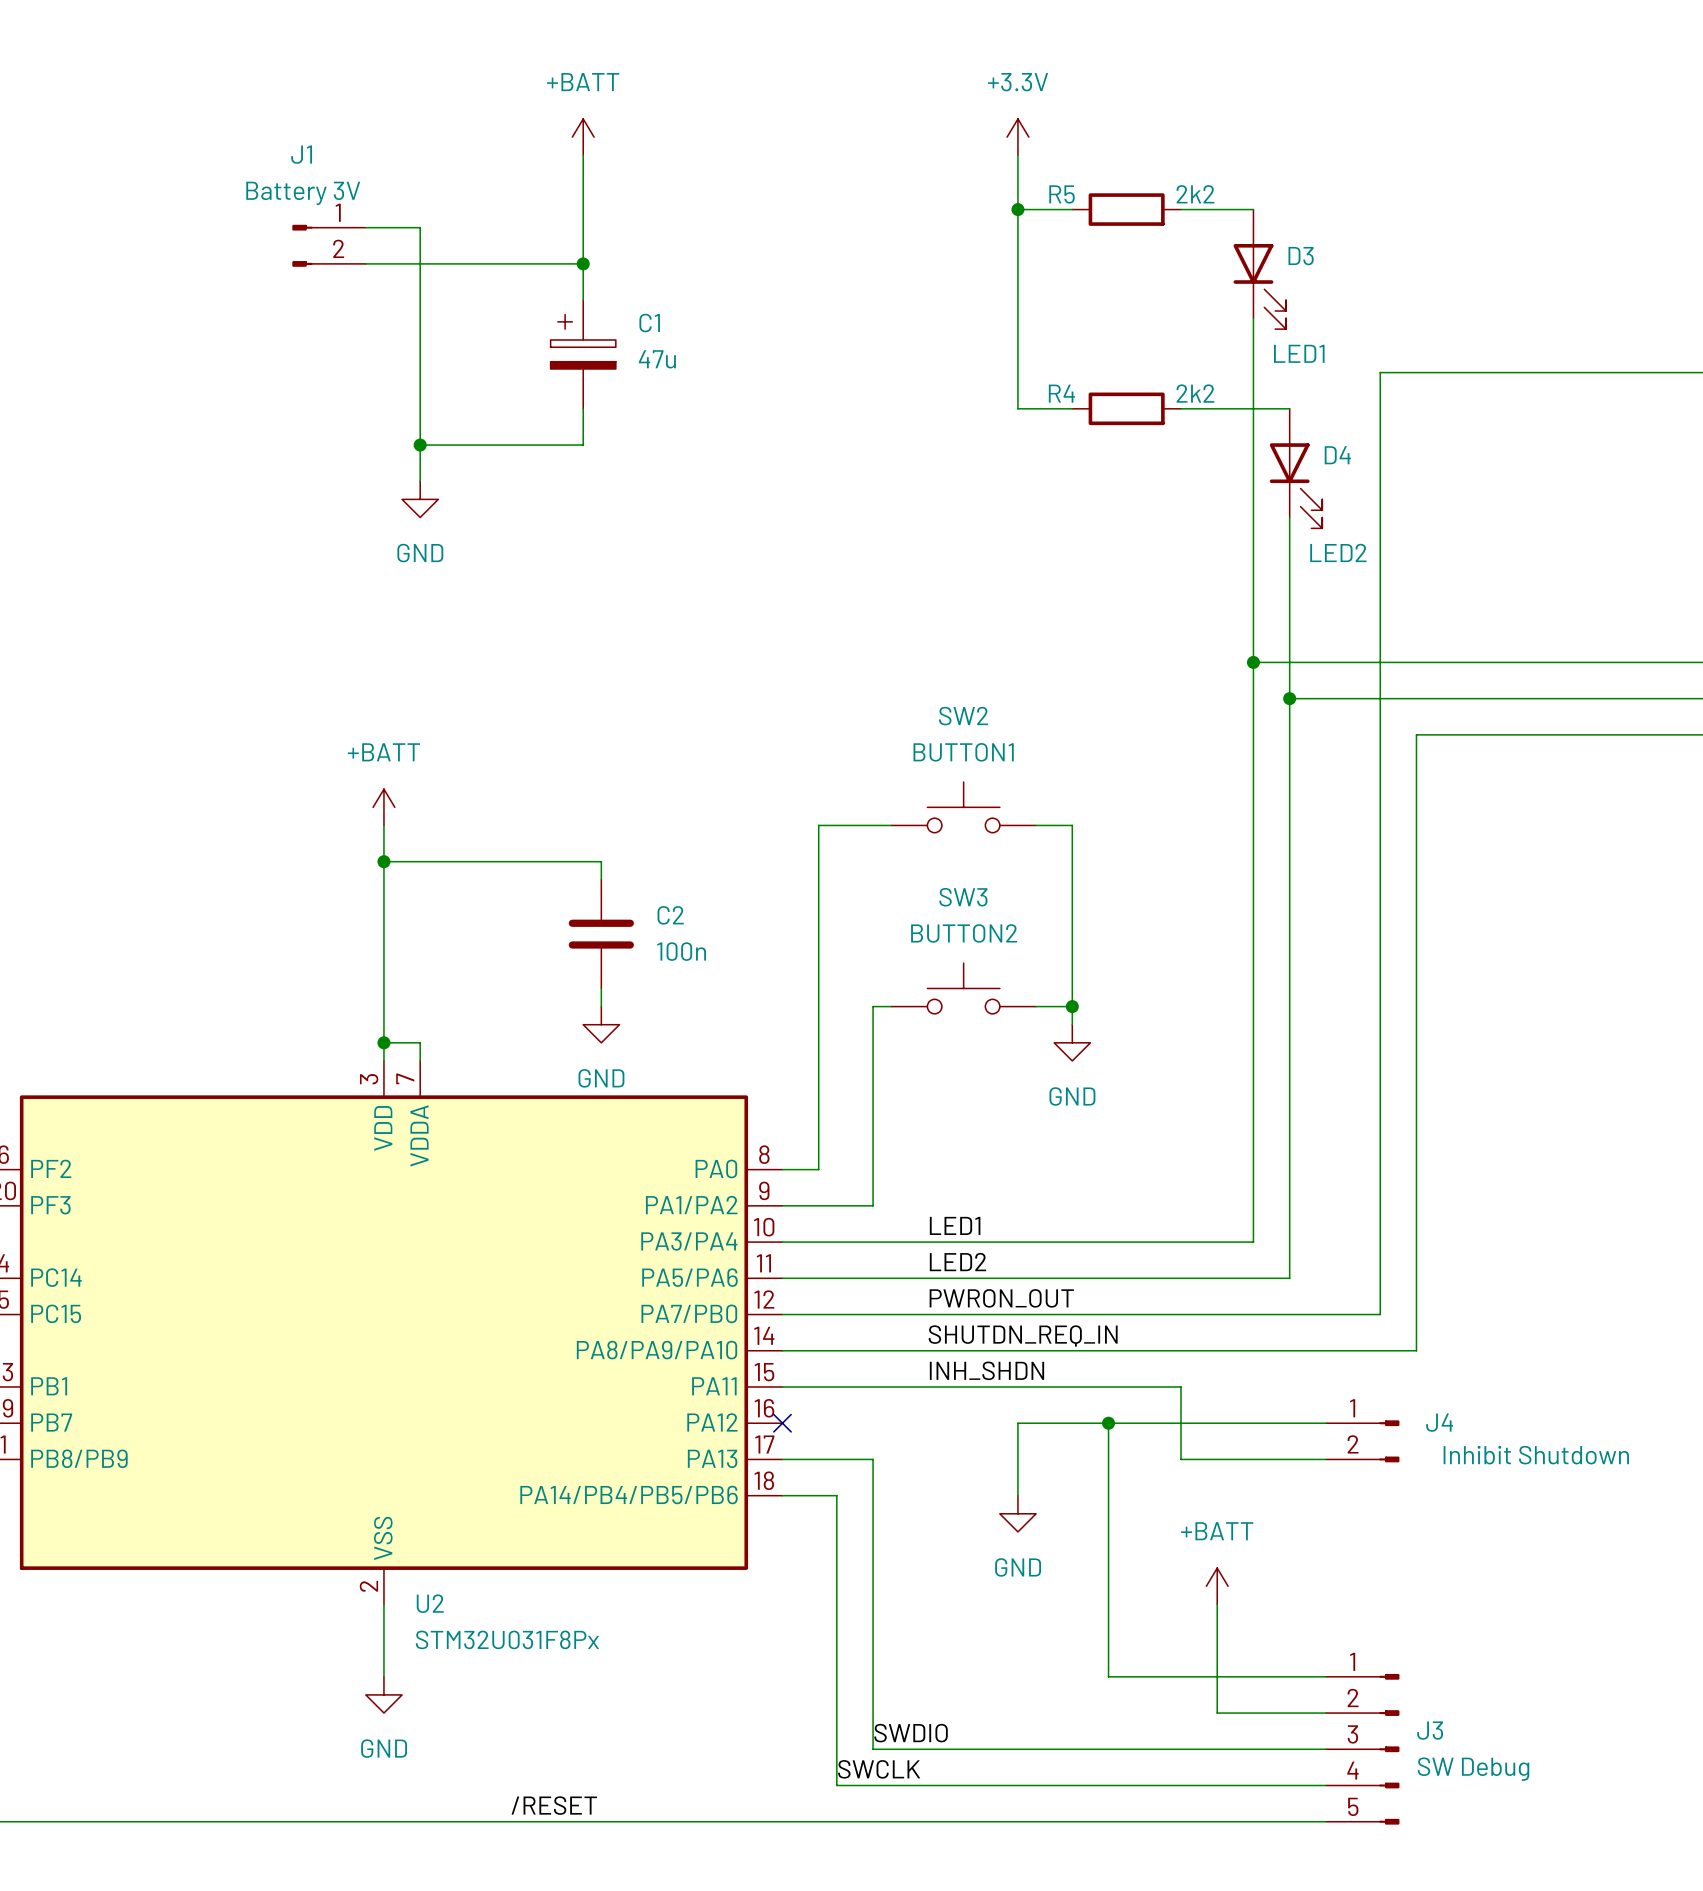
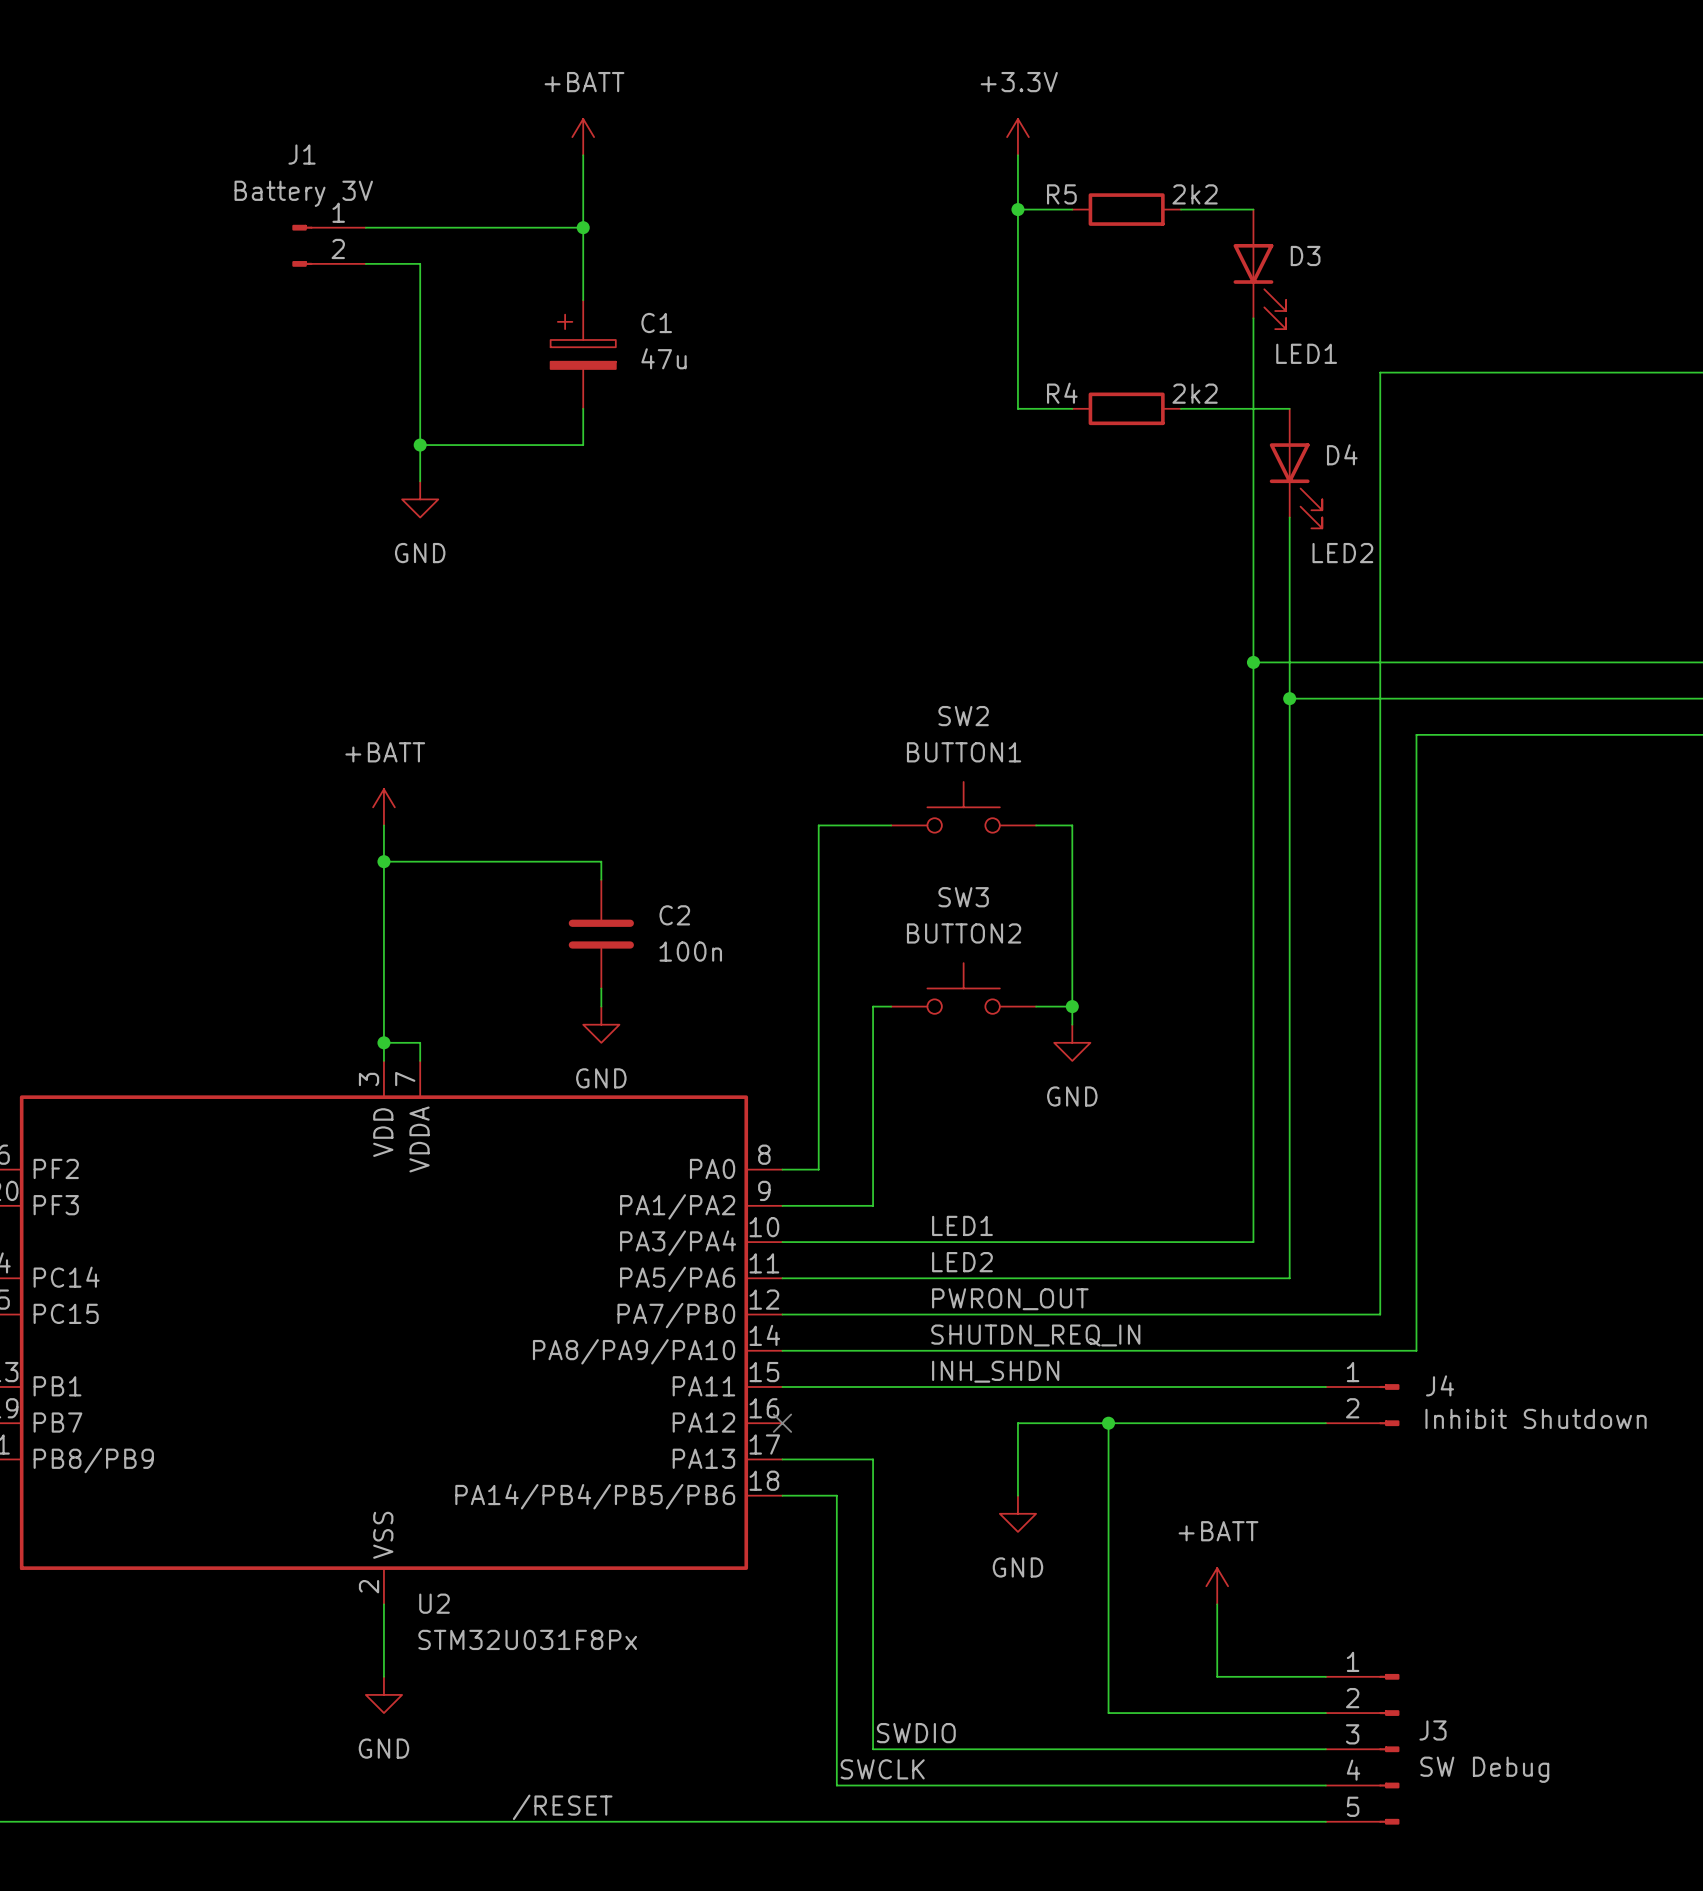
wire: (420, 227) (420, 263) (583, 263) -> (420, 227) (583, 227)
junction position: (583, 263) -> (583, 227)
wire: (1180, 1386) (1180, 1459) (1325, 1459) -> (1180, 1386) (1325, 1386)
J4 position: (1362, 1441) -> (1362, 1405)
wire: (1108, 1676) (1217, 1676) (1217, 1713) -> (1108, 1676) (1108, 1713) (1217, 1713)

